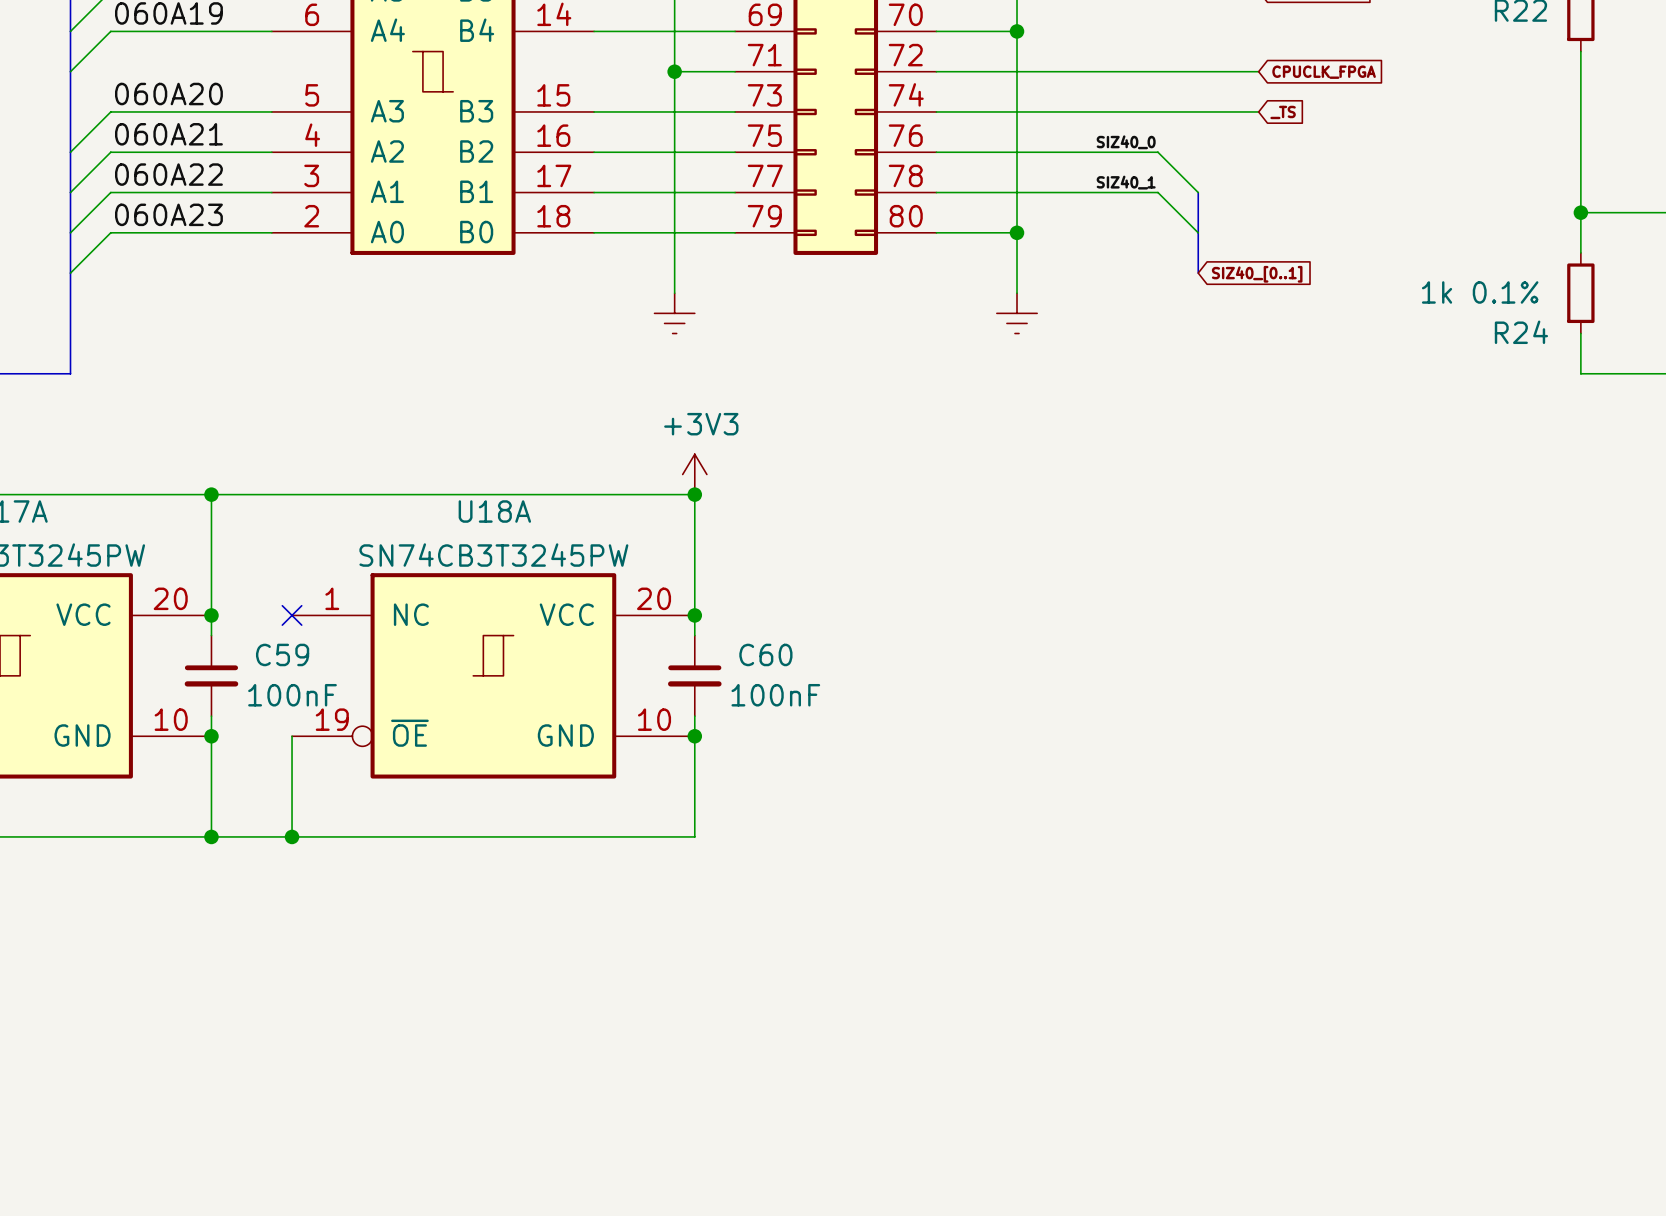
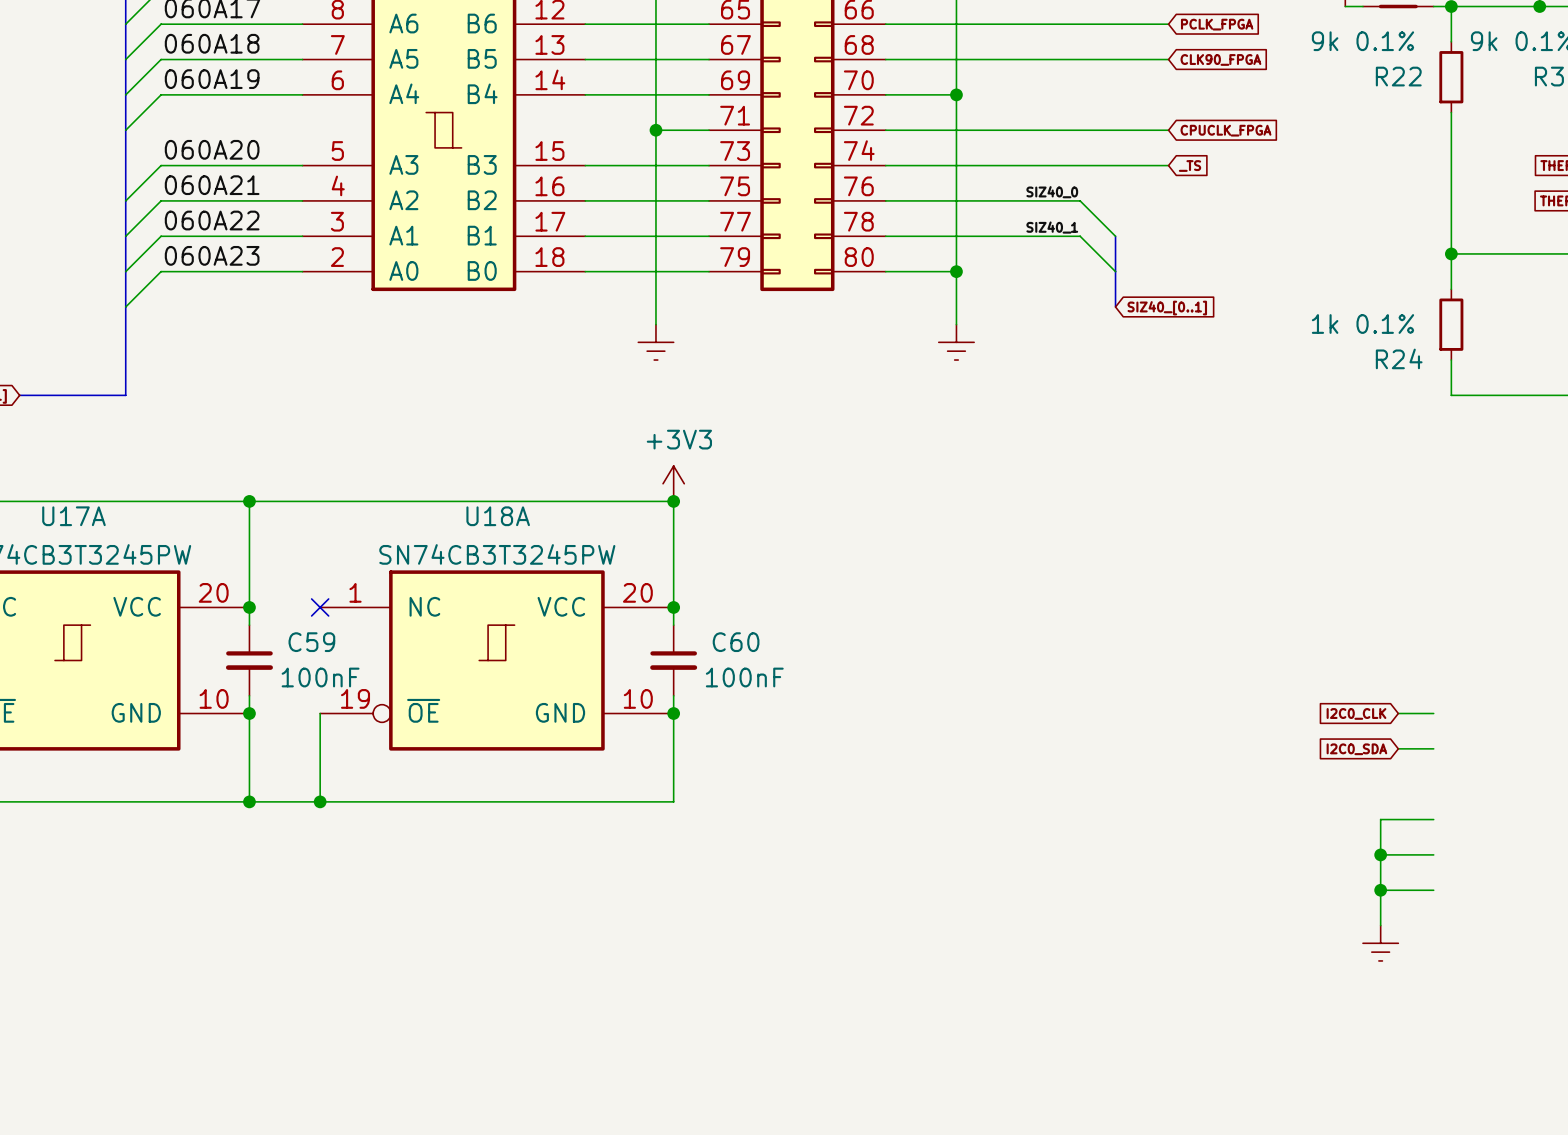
global label: none -> I2C0_CLK (1356, 713)
wire: none -> (1398, 713) (1433, 713)
wire: none -> (1398, 748) (1433, 748)
global label: none -> I2C0_SDA (1356, 749)
wire: none -> (1433, 819) (1380, 819) (1380, 925)
wire: none -> (1380, 854) (1433, 854)
junction: none -> (1380, 854)
wire: none -> (1380, 890) (1433, 890)
junction: none -> (1380, 890)
power symbol: none -> (1380, 943)

